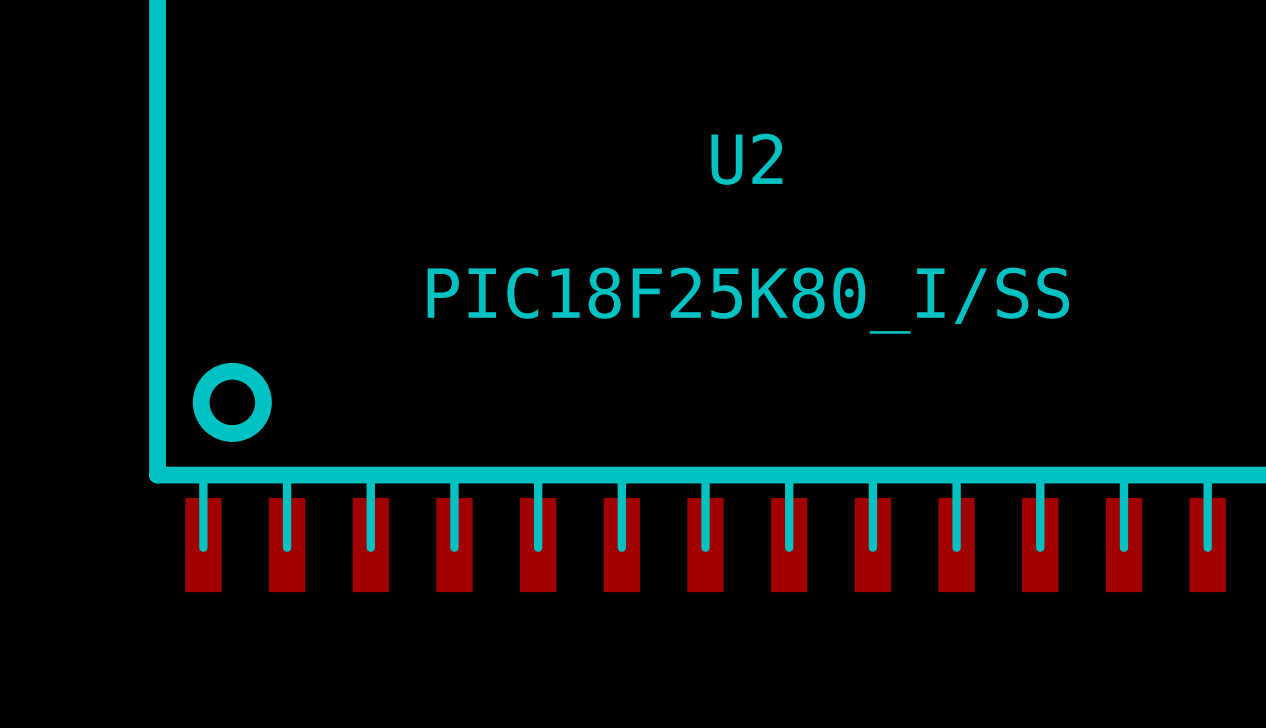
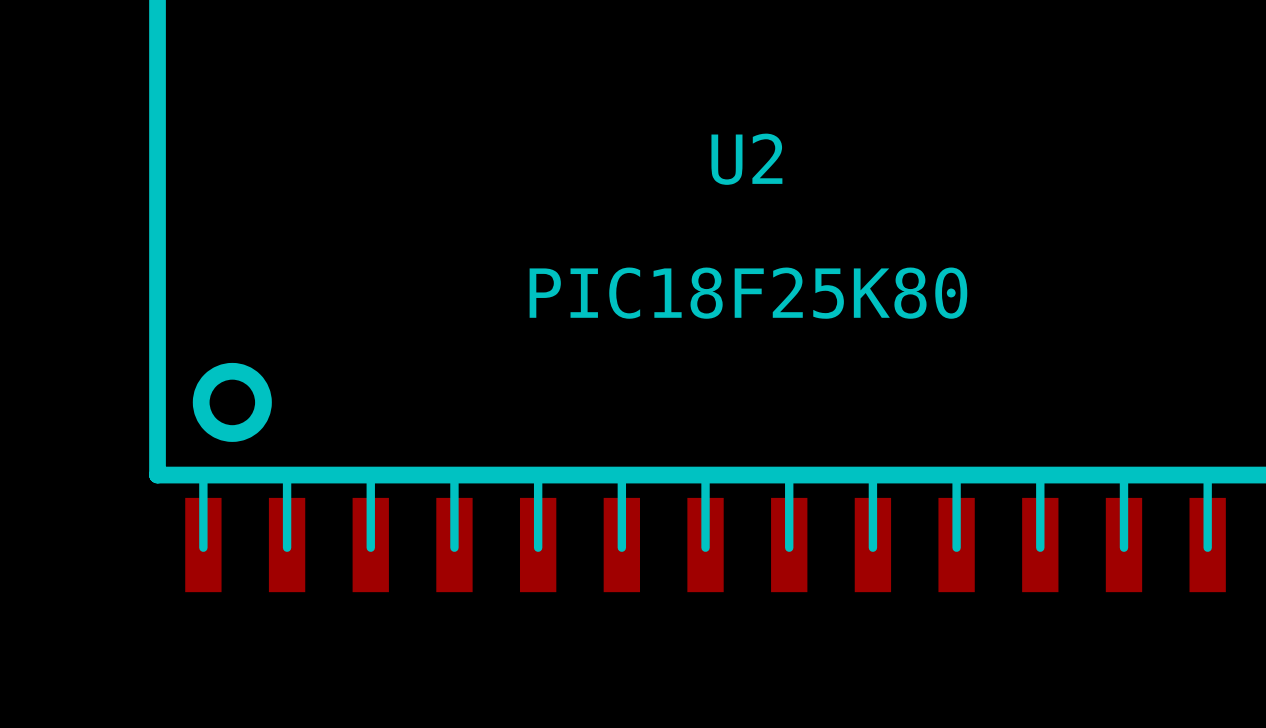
U2 value: PIC18F25K80_I/SS (748, 300) -> PIC18F25K80 (748, 293)

